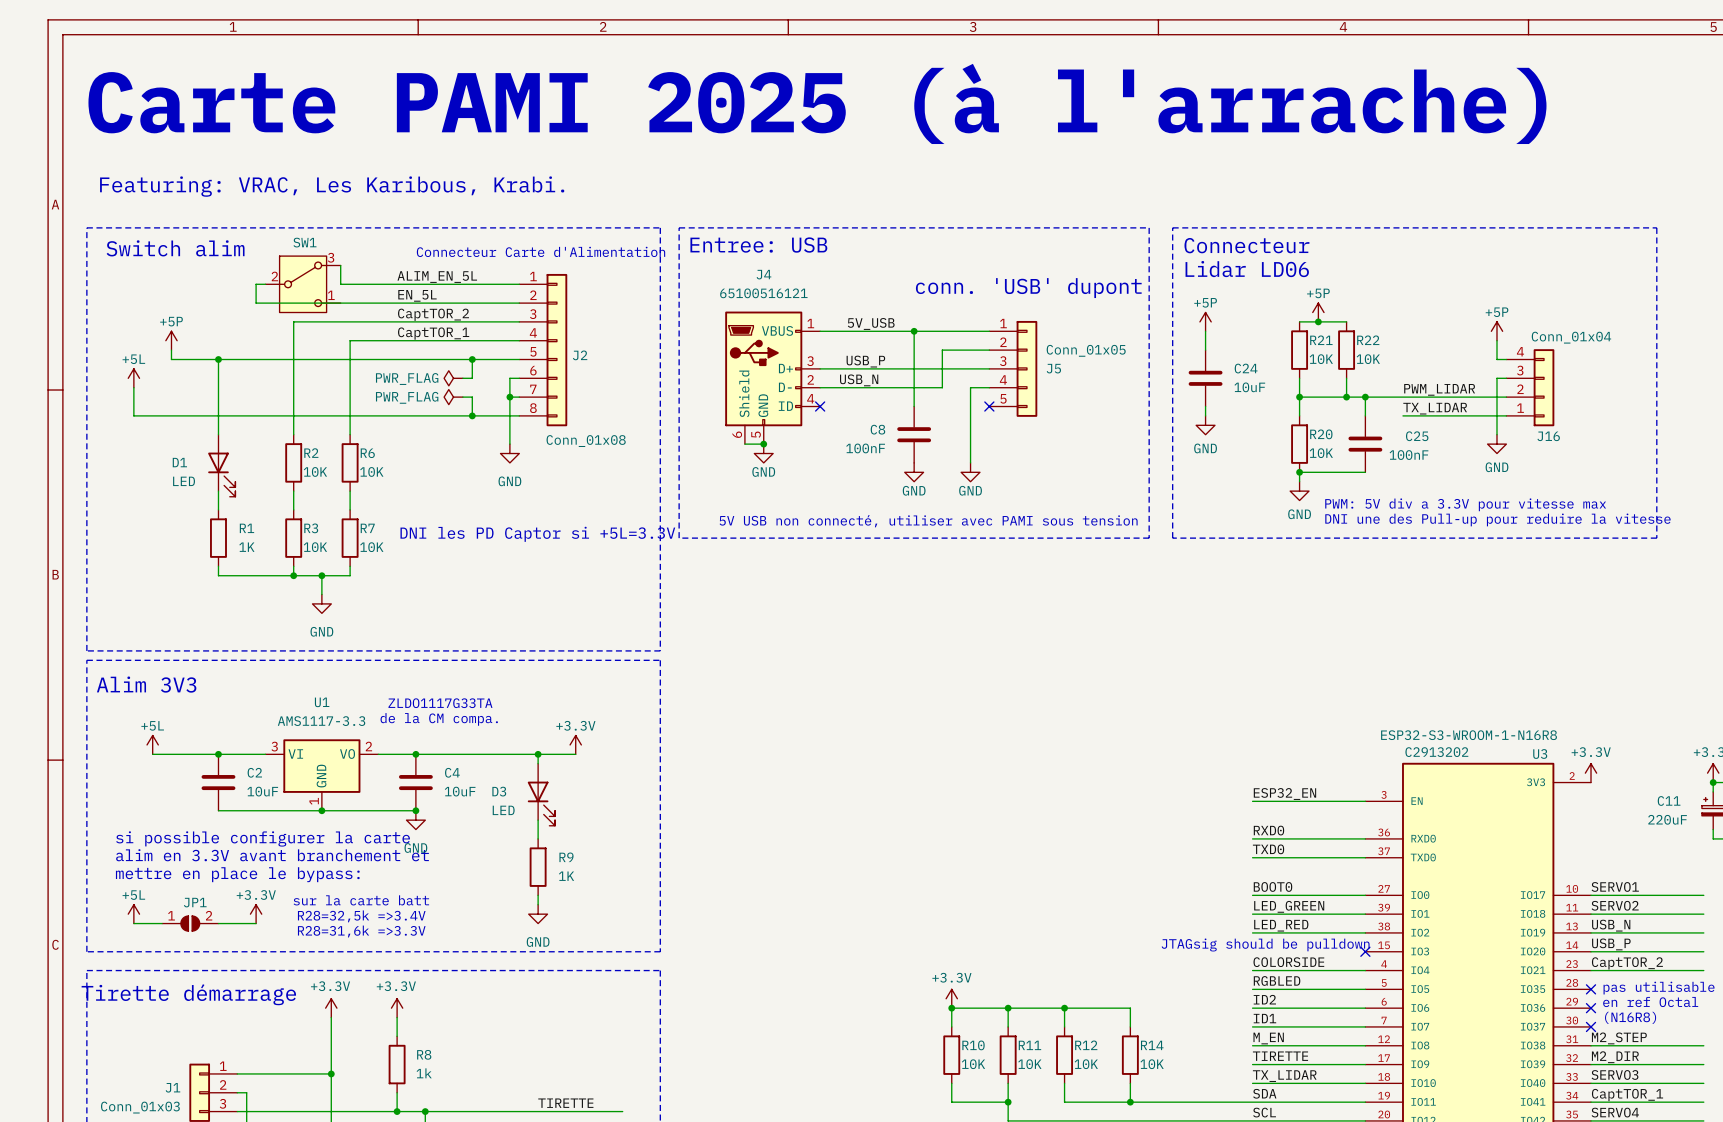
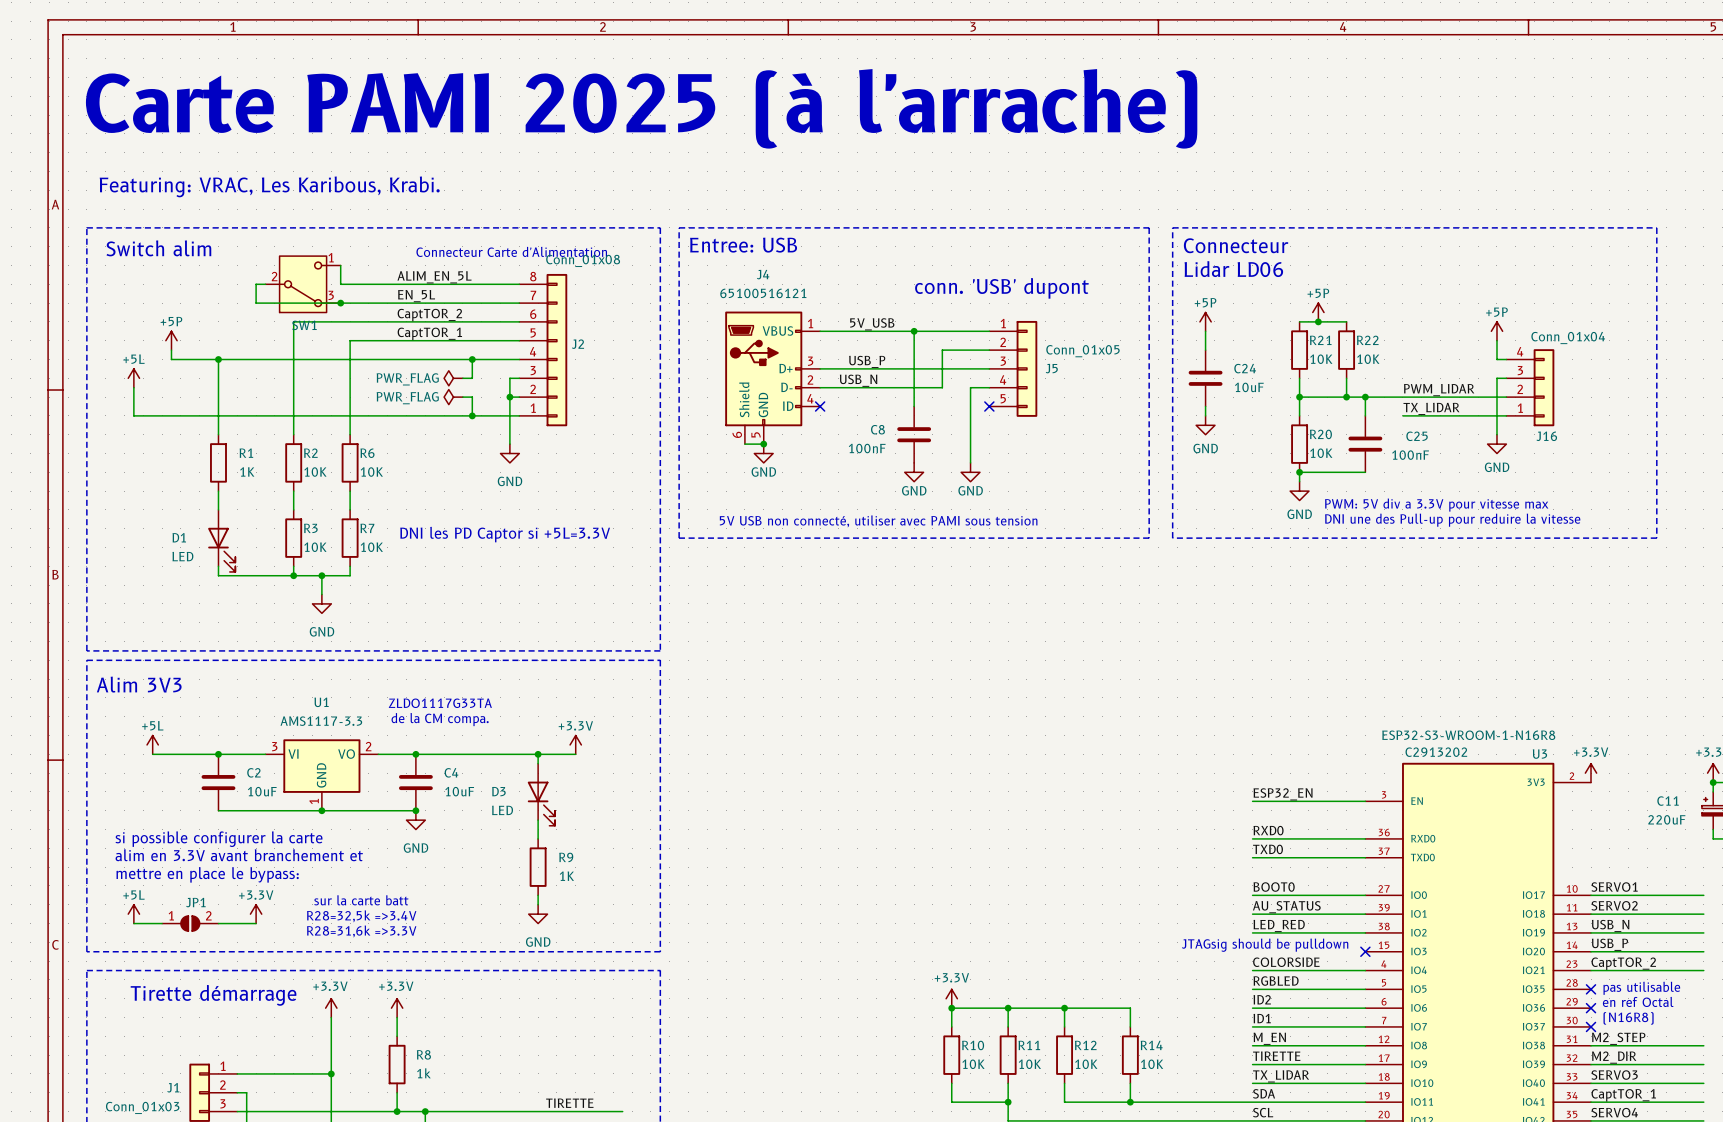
SW1 flip: as is (303, 284) -> up-down (303, 284)
junction: none -> (340, 303)
J2 flip: as is (556, 350) -> up-down (556, 350)
D1 position: (221, 465) -> (221, 540)
R1 position: (218, 538) -> (218, 462)
label: LED_GREEN (1289, 906) -> AU_STATUS (1286, 907)

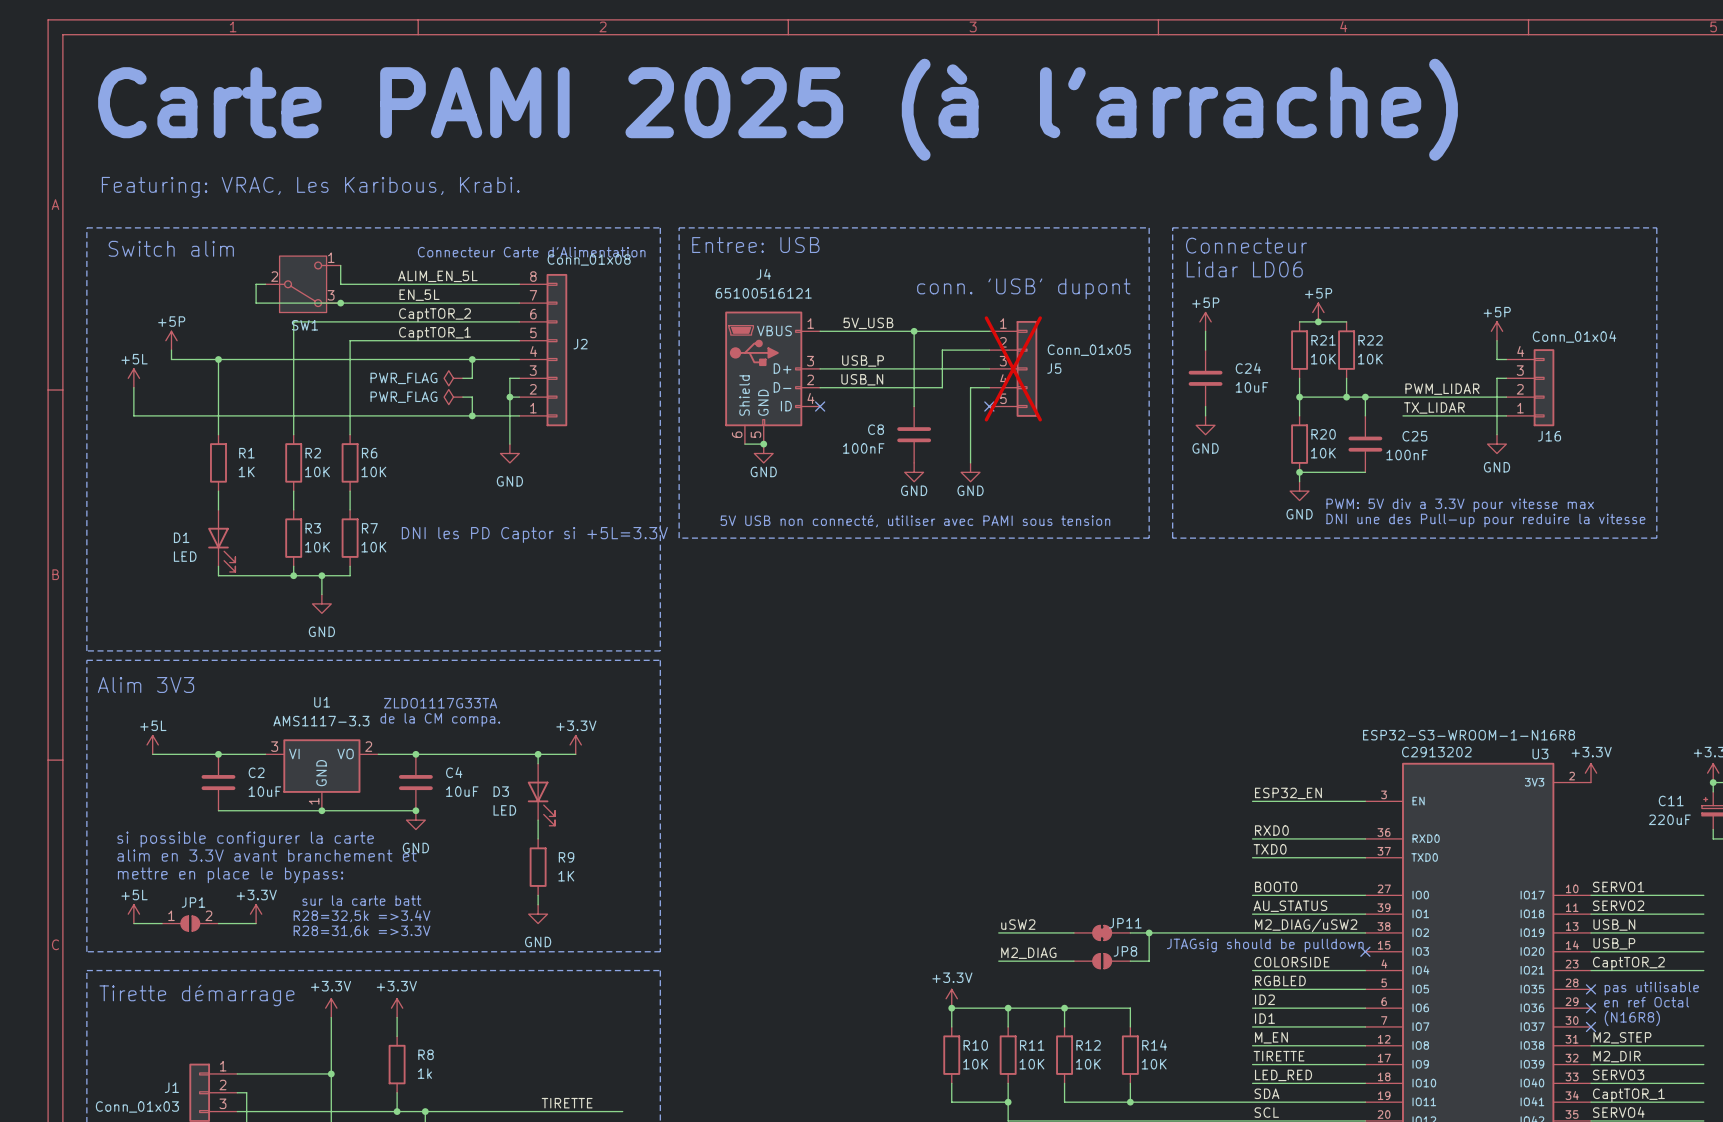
J5 do-not-place cross: none -> (1013, 368)
label: none -> uSW2 (1018, 924)
label: LED_RED (1279, 925) -> M2_DIAG/uSW2 (1306, 925)
wire: none -> (998, 932) (1073, 932)
JP11: none -> (1102, 932)
wire: none -> (1130, 932) (1252, 932)
wire: none -> (1149, 932) (1149, 961) (1130, 961)
junction: none -> (1149, 932)
label: none -> M2_DIAG (1028, 953)
wire: none -> (998, 961) (1073, 961)
JP8: none -> (1102, 961)
label: TX_LIDAR (1281, 1076) -> LED_RED (1283, 1075)

